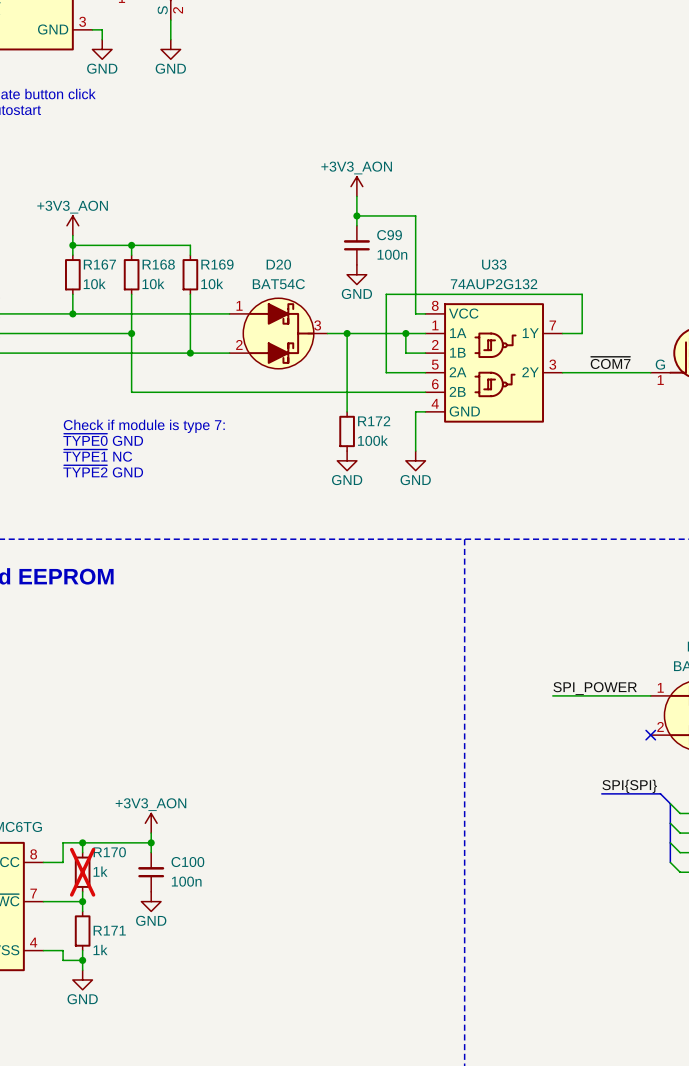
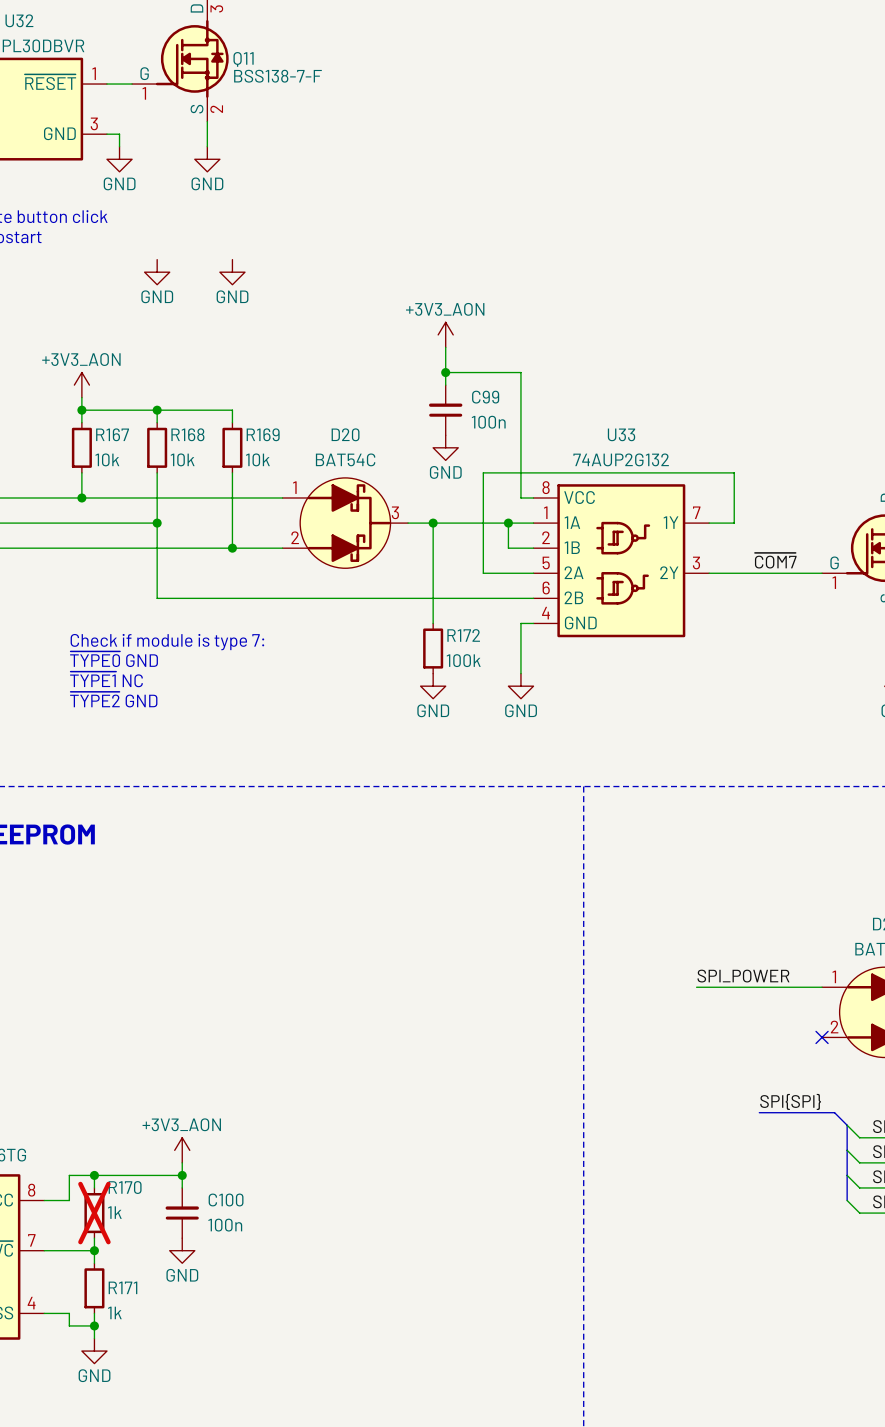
power symbol: none -> GND (157, 272)
power symbol: none -> GND (232, 272)

